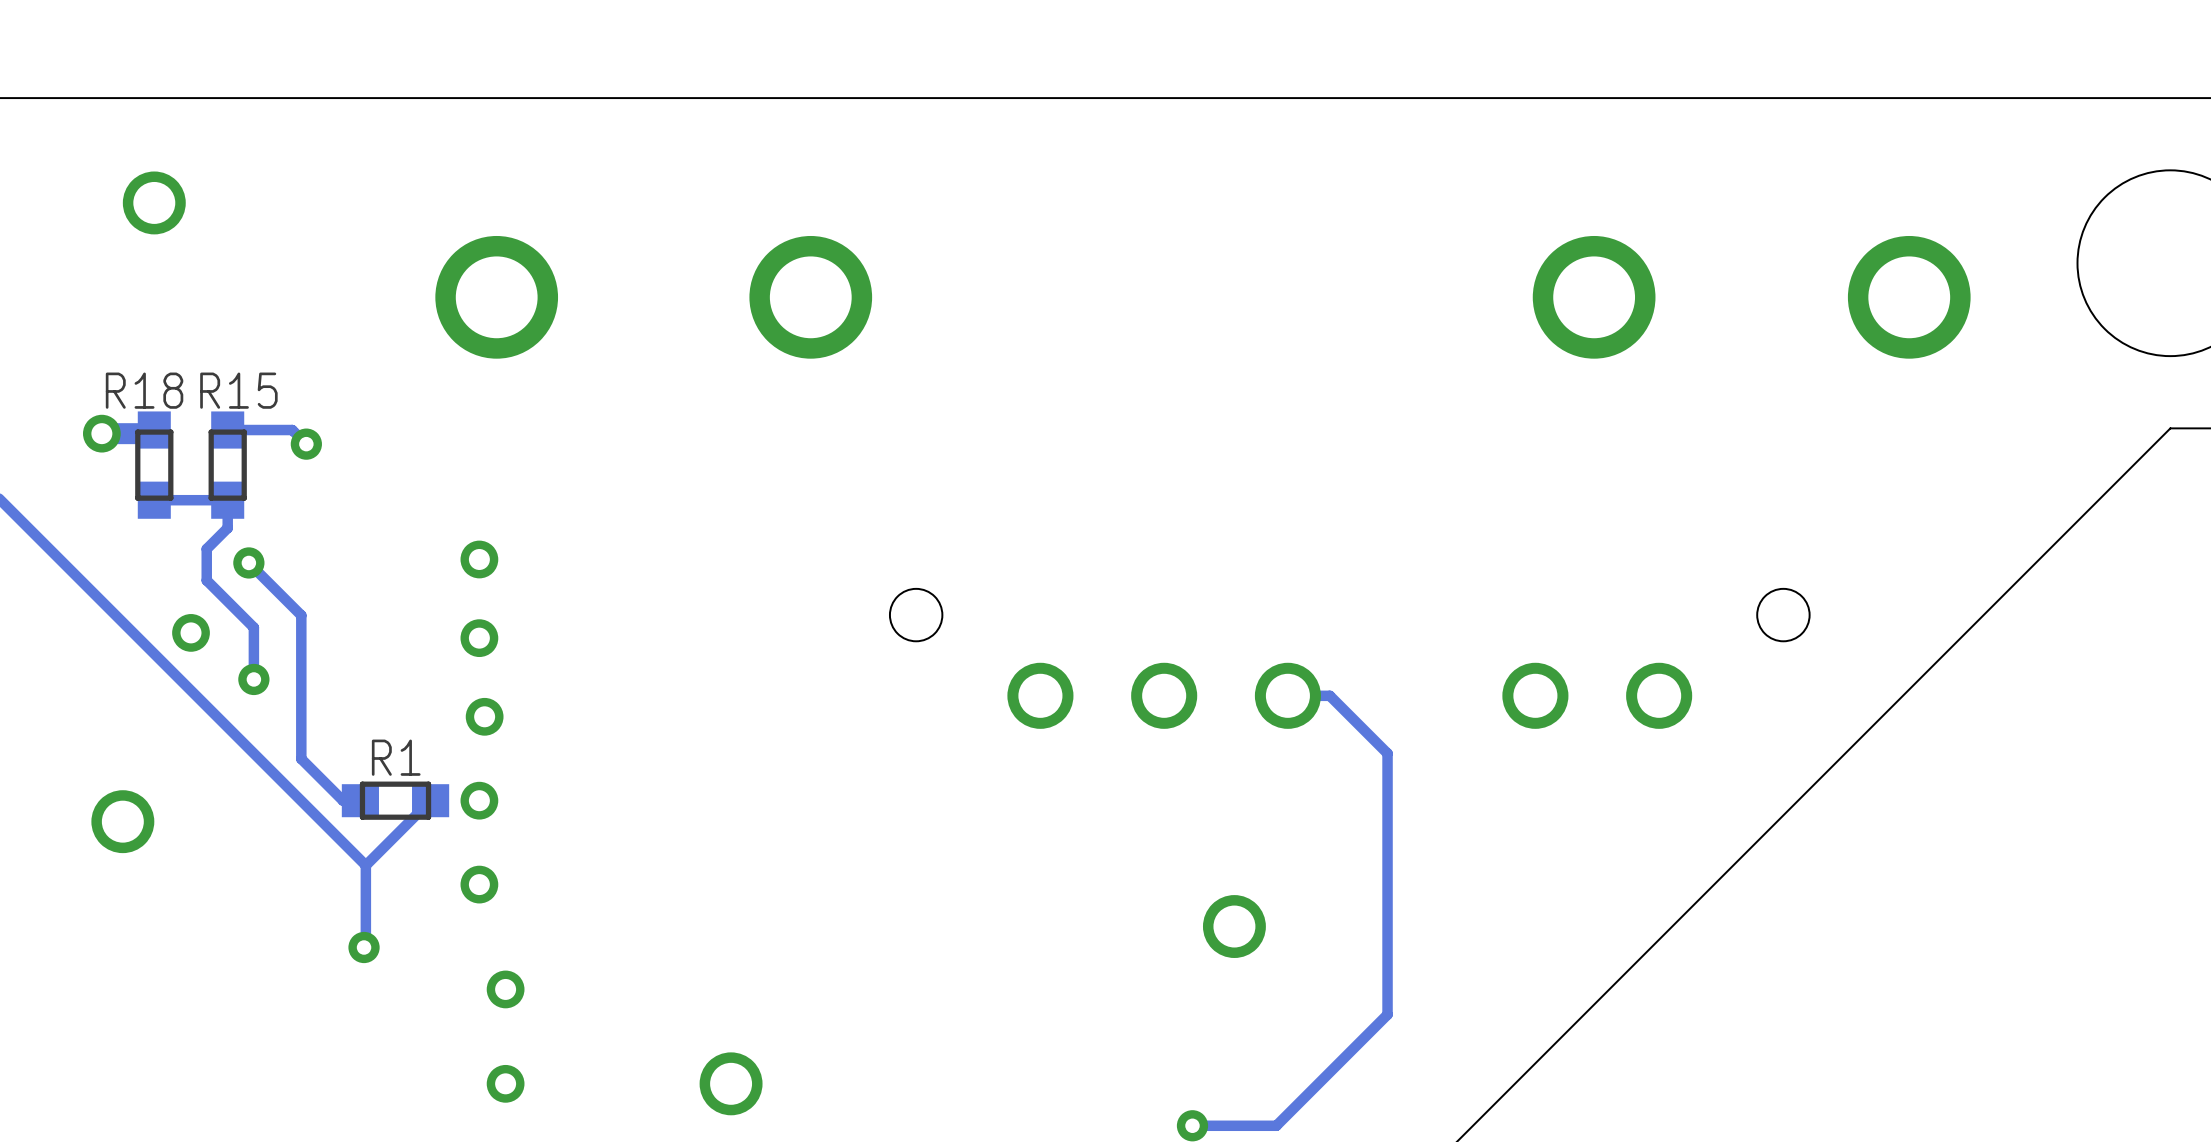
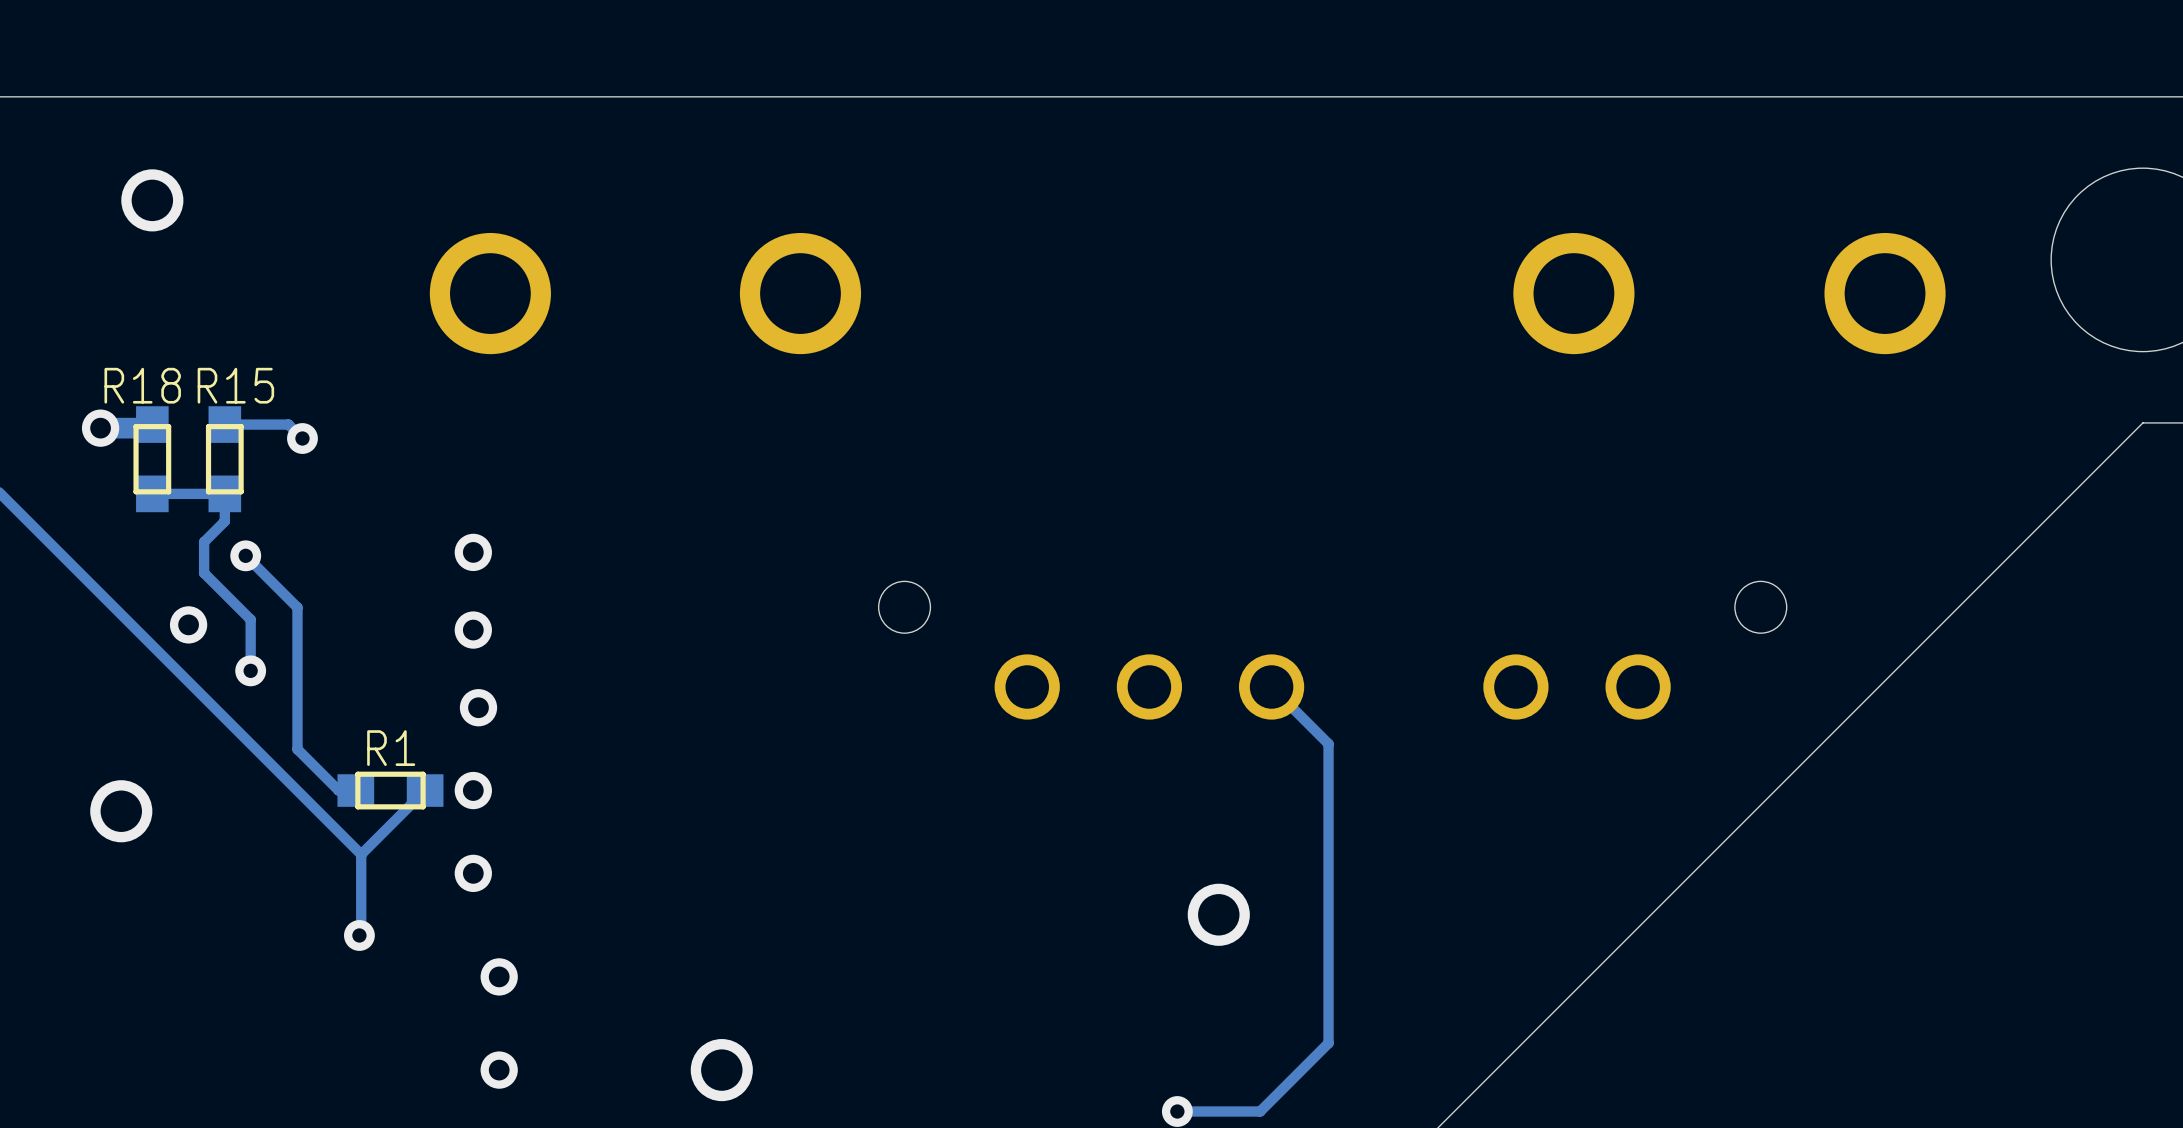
track: (1287, 695) (1329, 695) (1387, 753) (1387, 1014) (1345, 1056) -> (1271, 687) (1328, 743) (1328, 1043)

